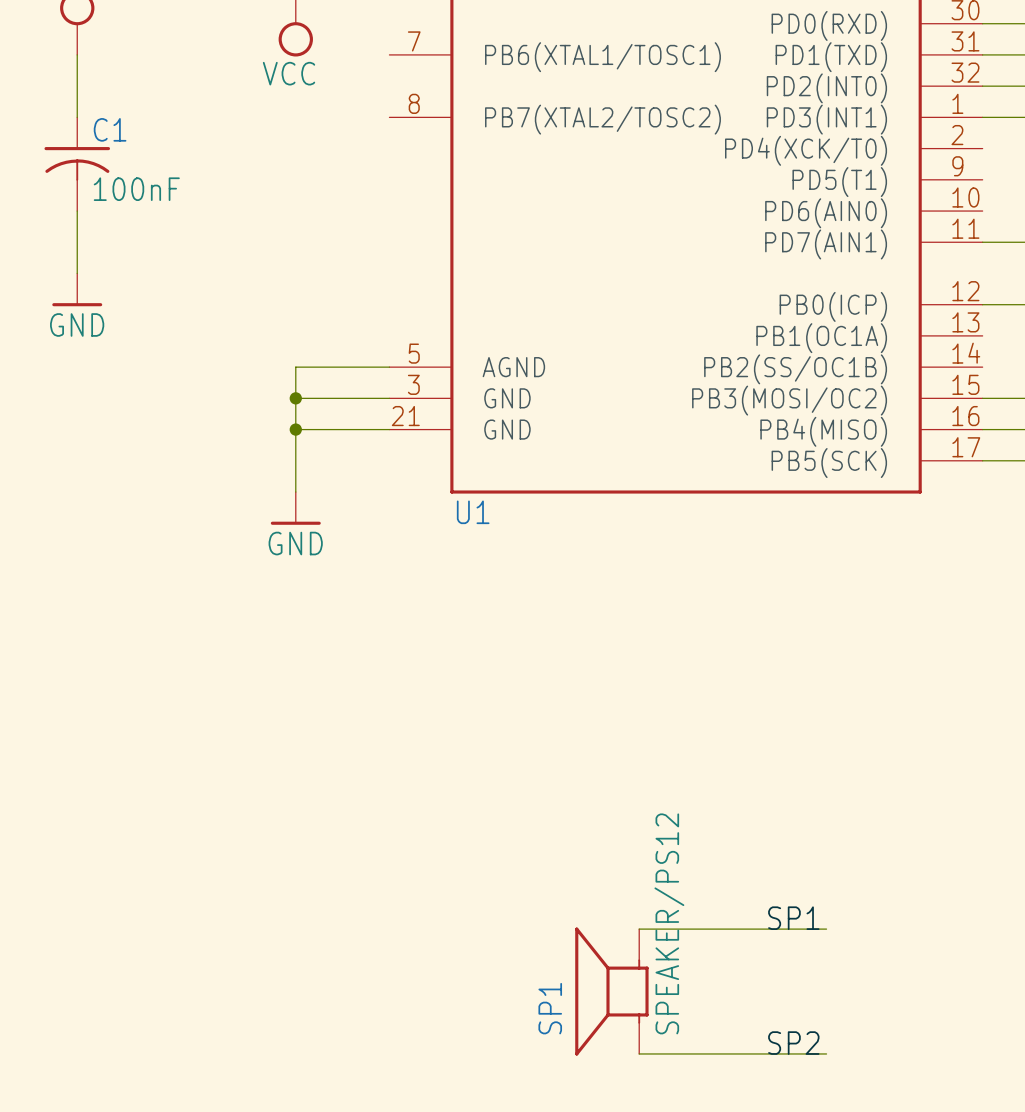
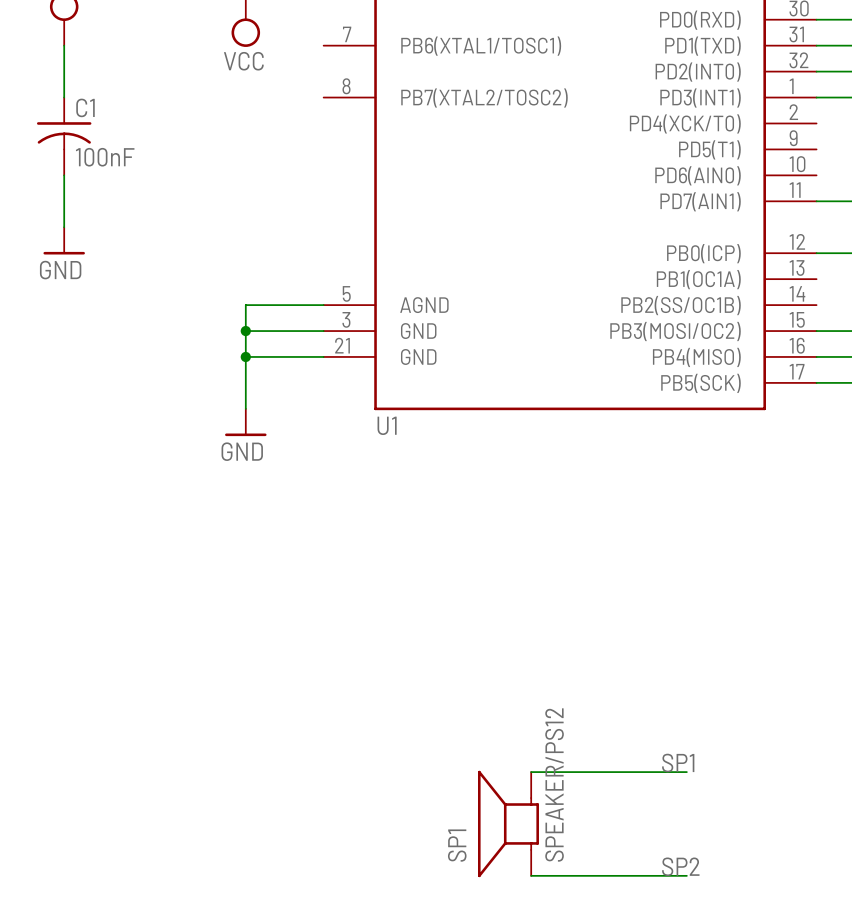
label: SP1 (793, 918) -> none
text: none -> SP1 (678, 763)
label: SP2 (793, 1043) -> none
text: none -> SP2 (680, 866)

